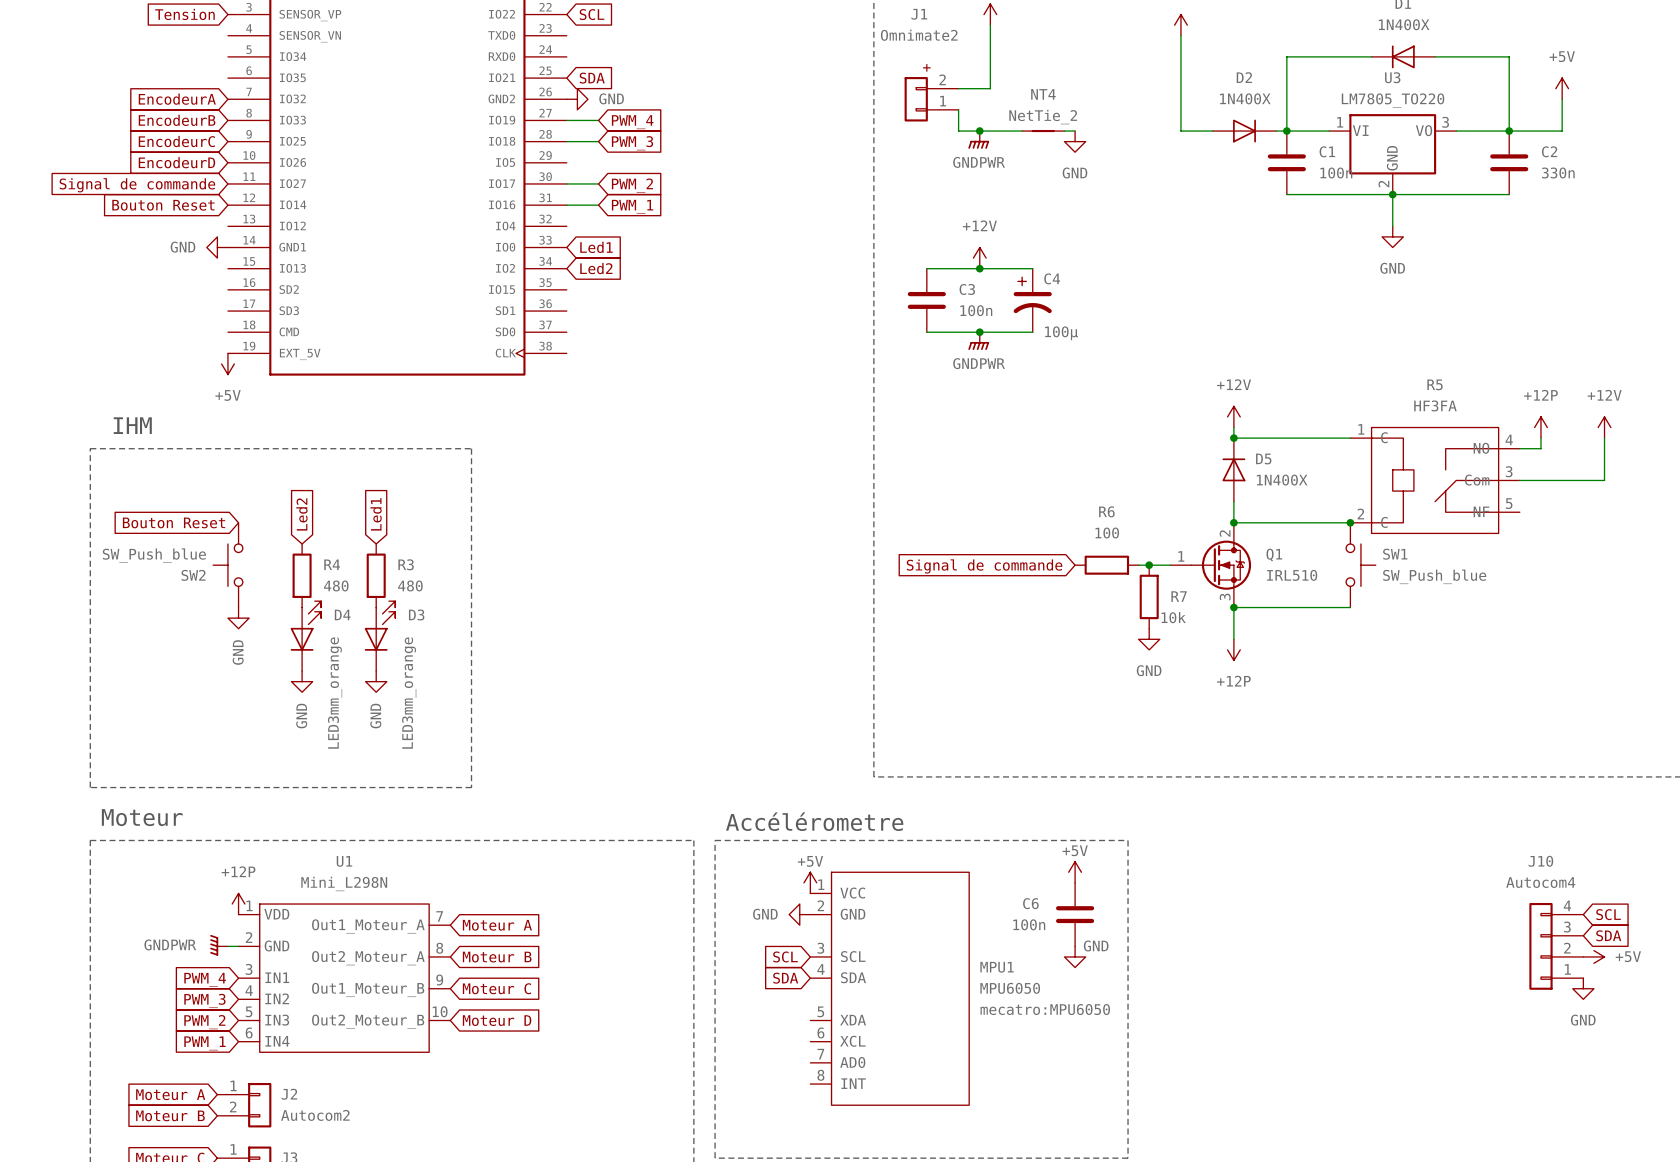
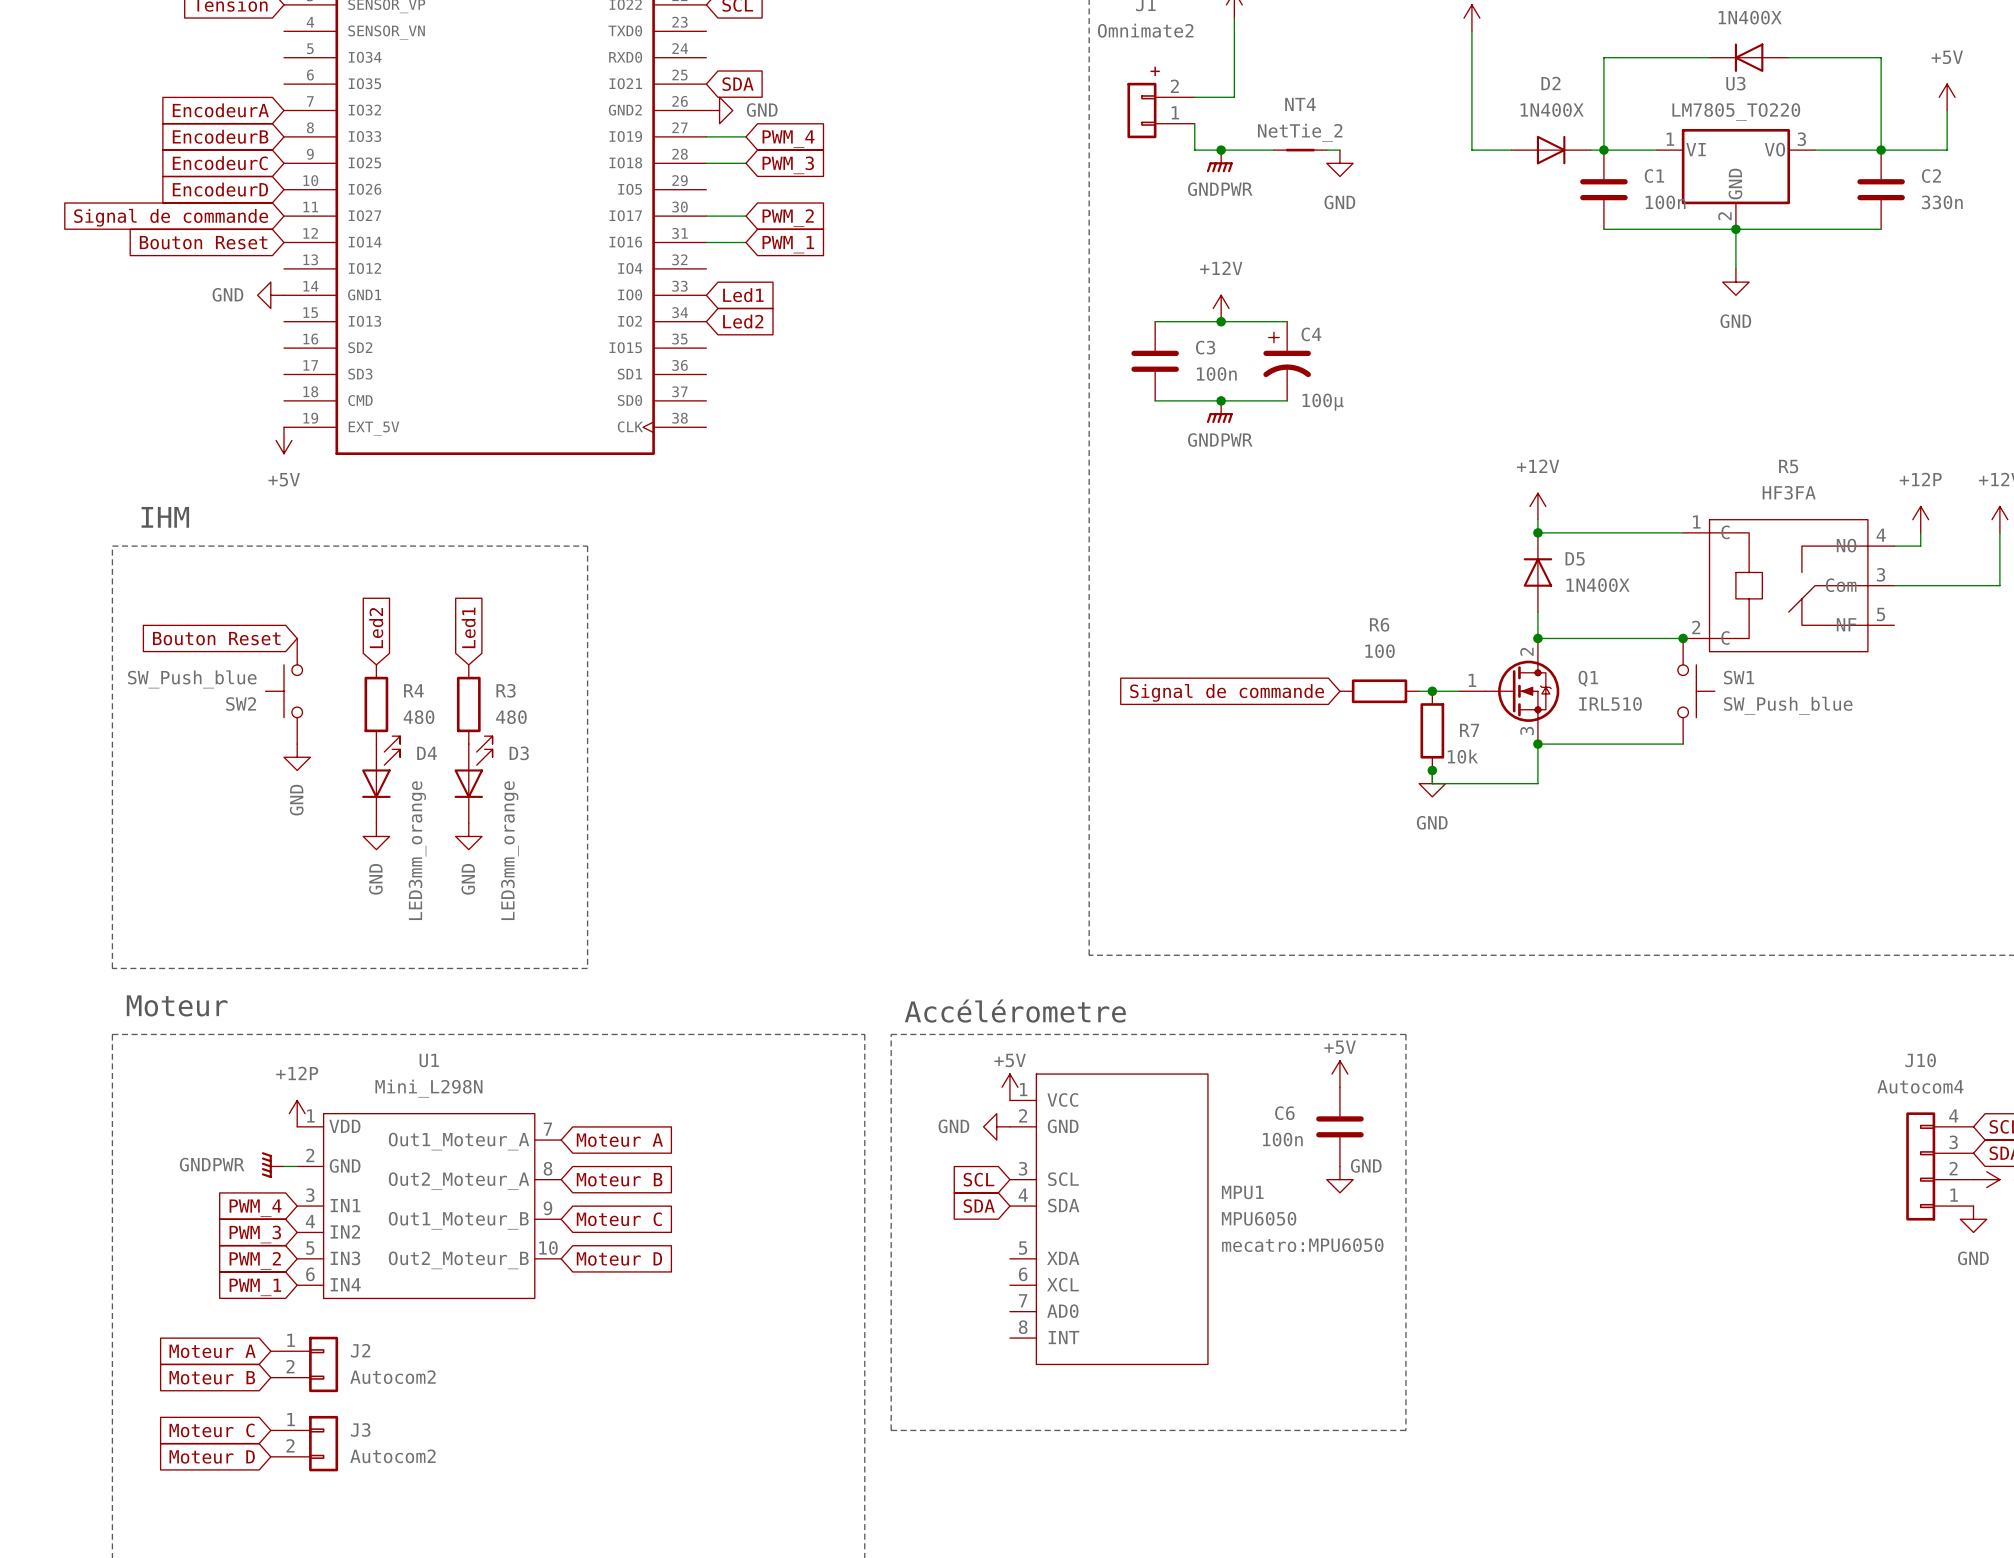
wire: none -> (1432, 770) (1432, 783) (1537, 783)
junction: none -> (1432, 770)
power symbol: +12P (1233, 649) -> none

